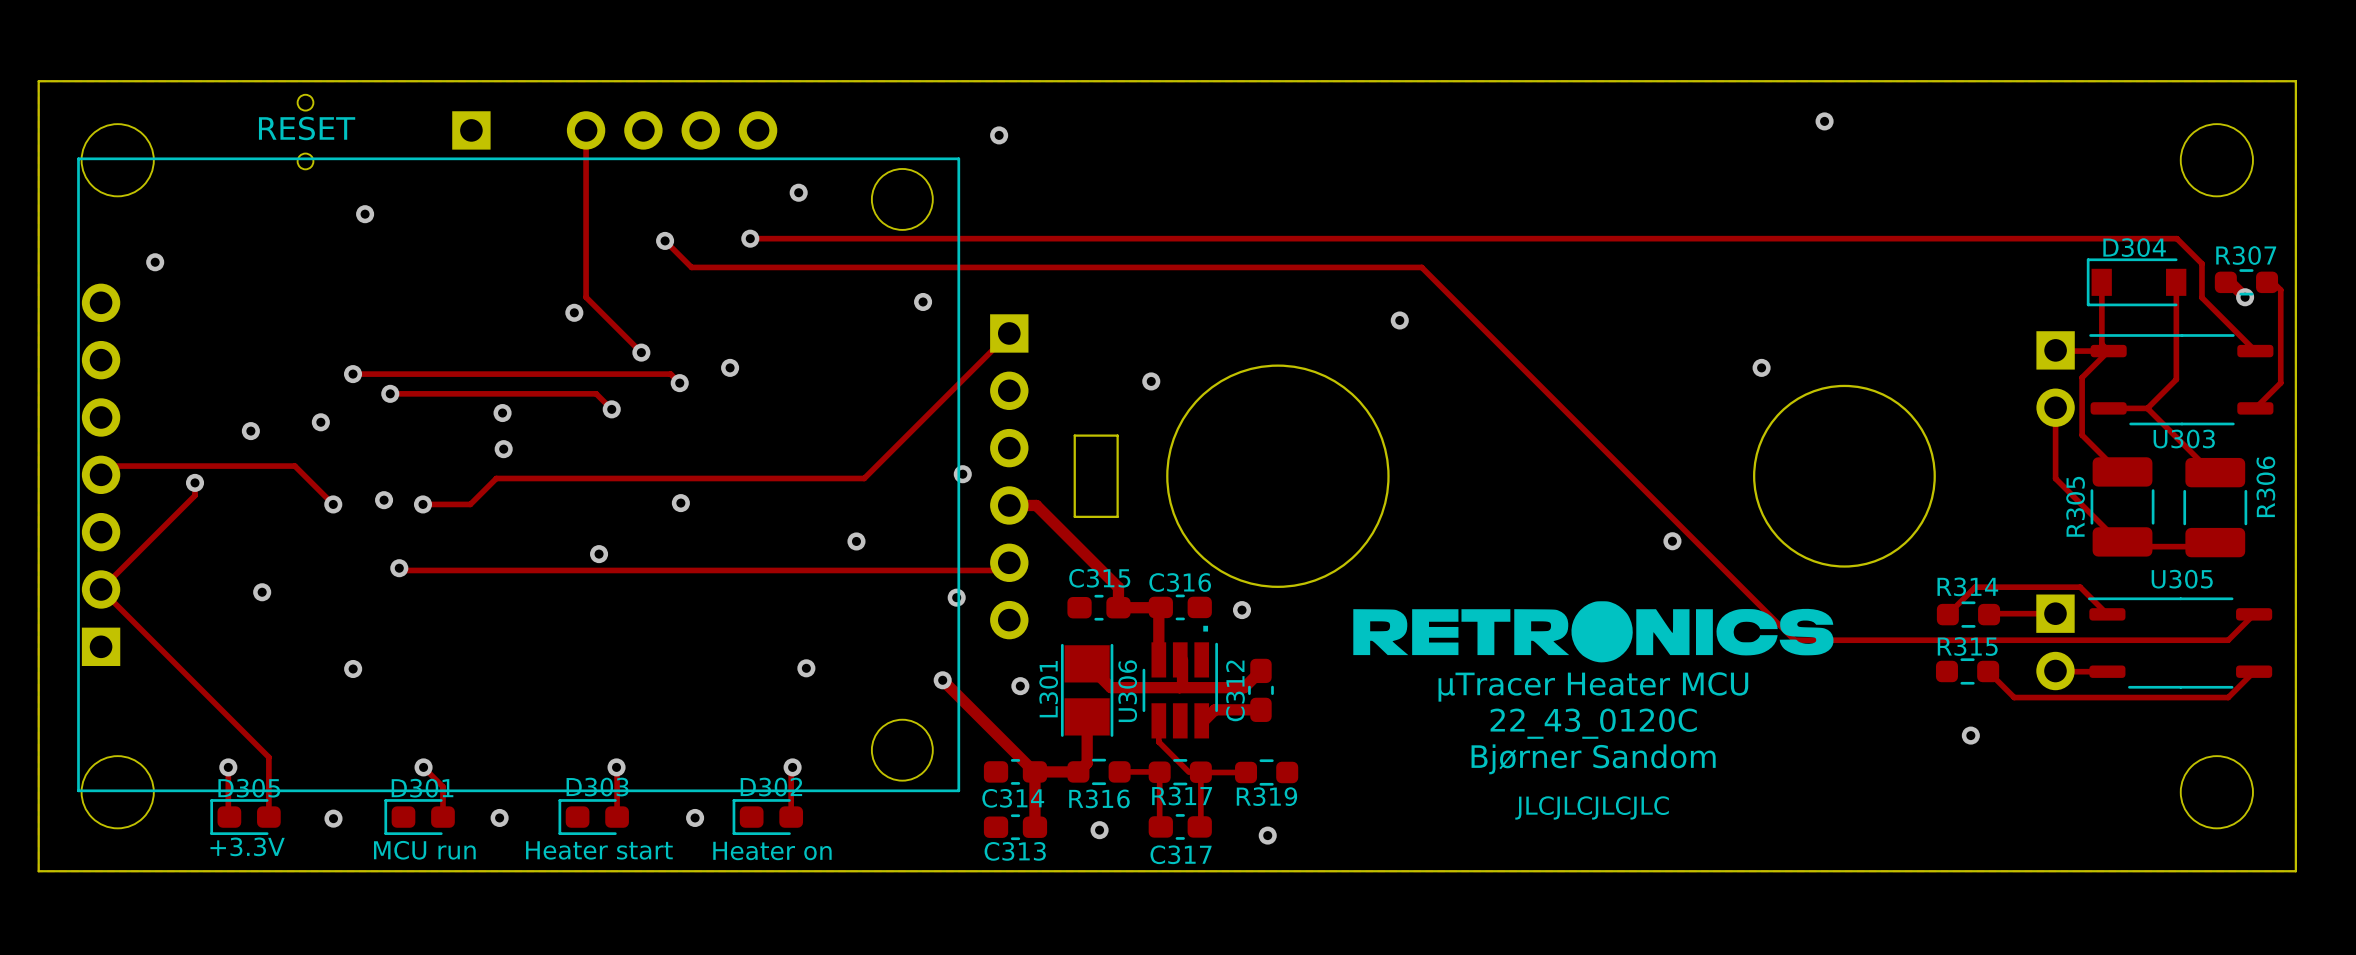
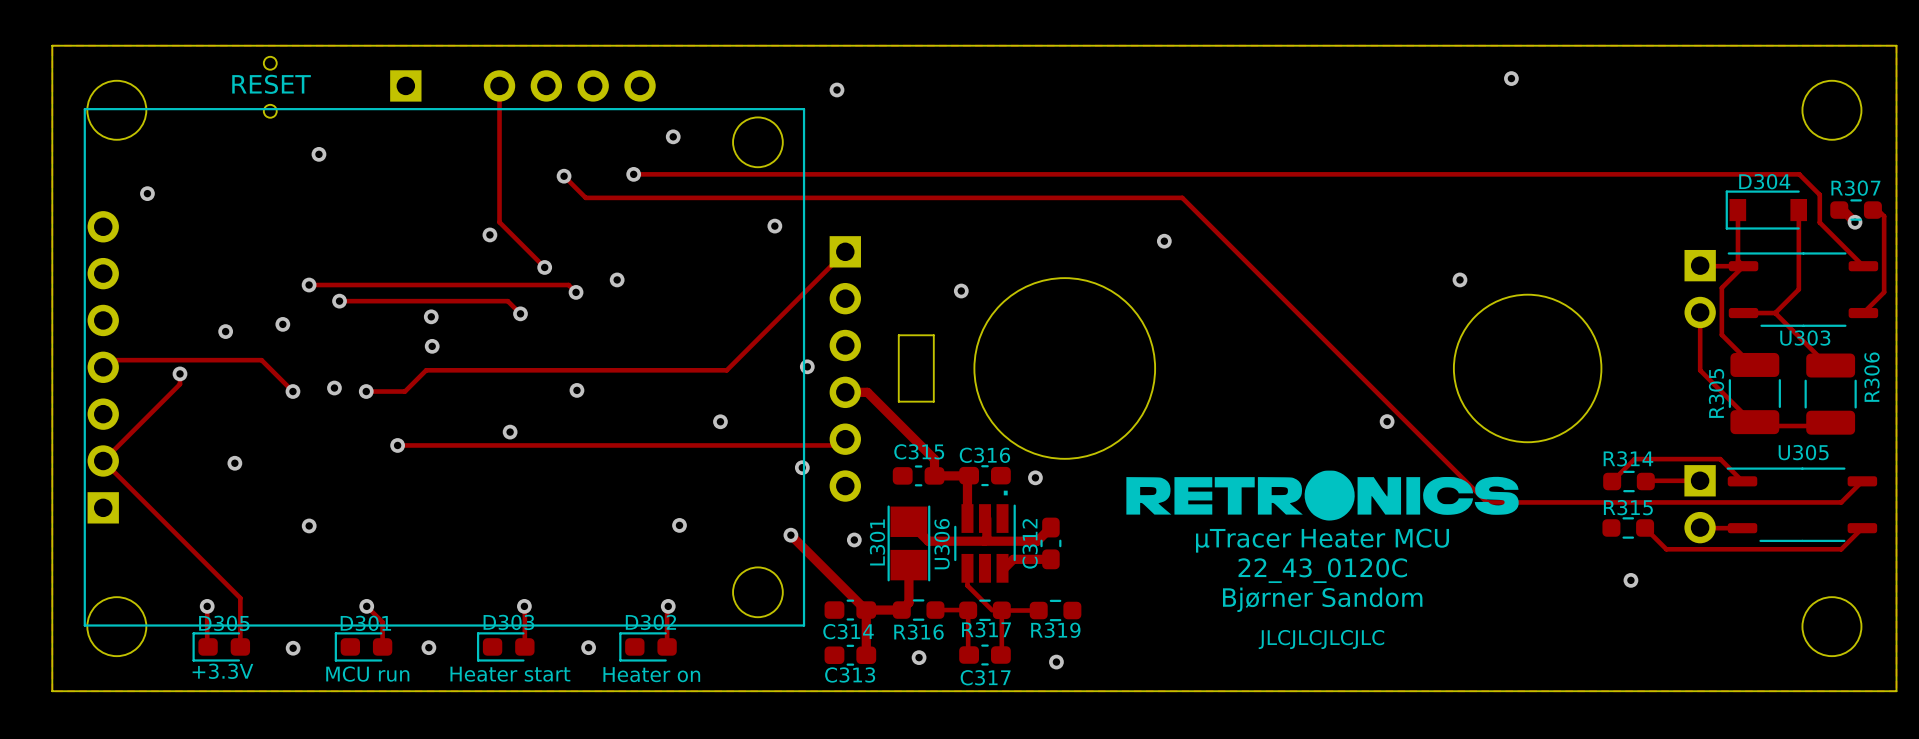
track: (399, 568) (401, 570) (461, 570) -> none
via position: (399, 568) -> (397, 445)

